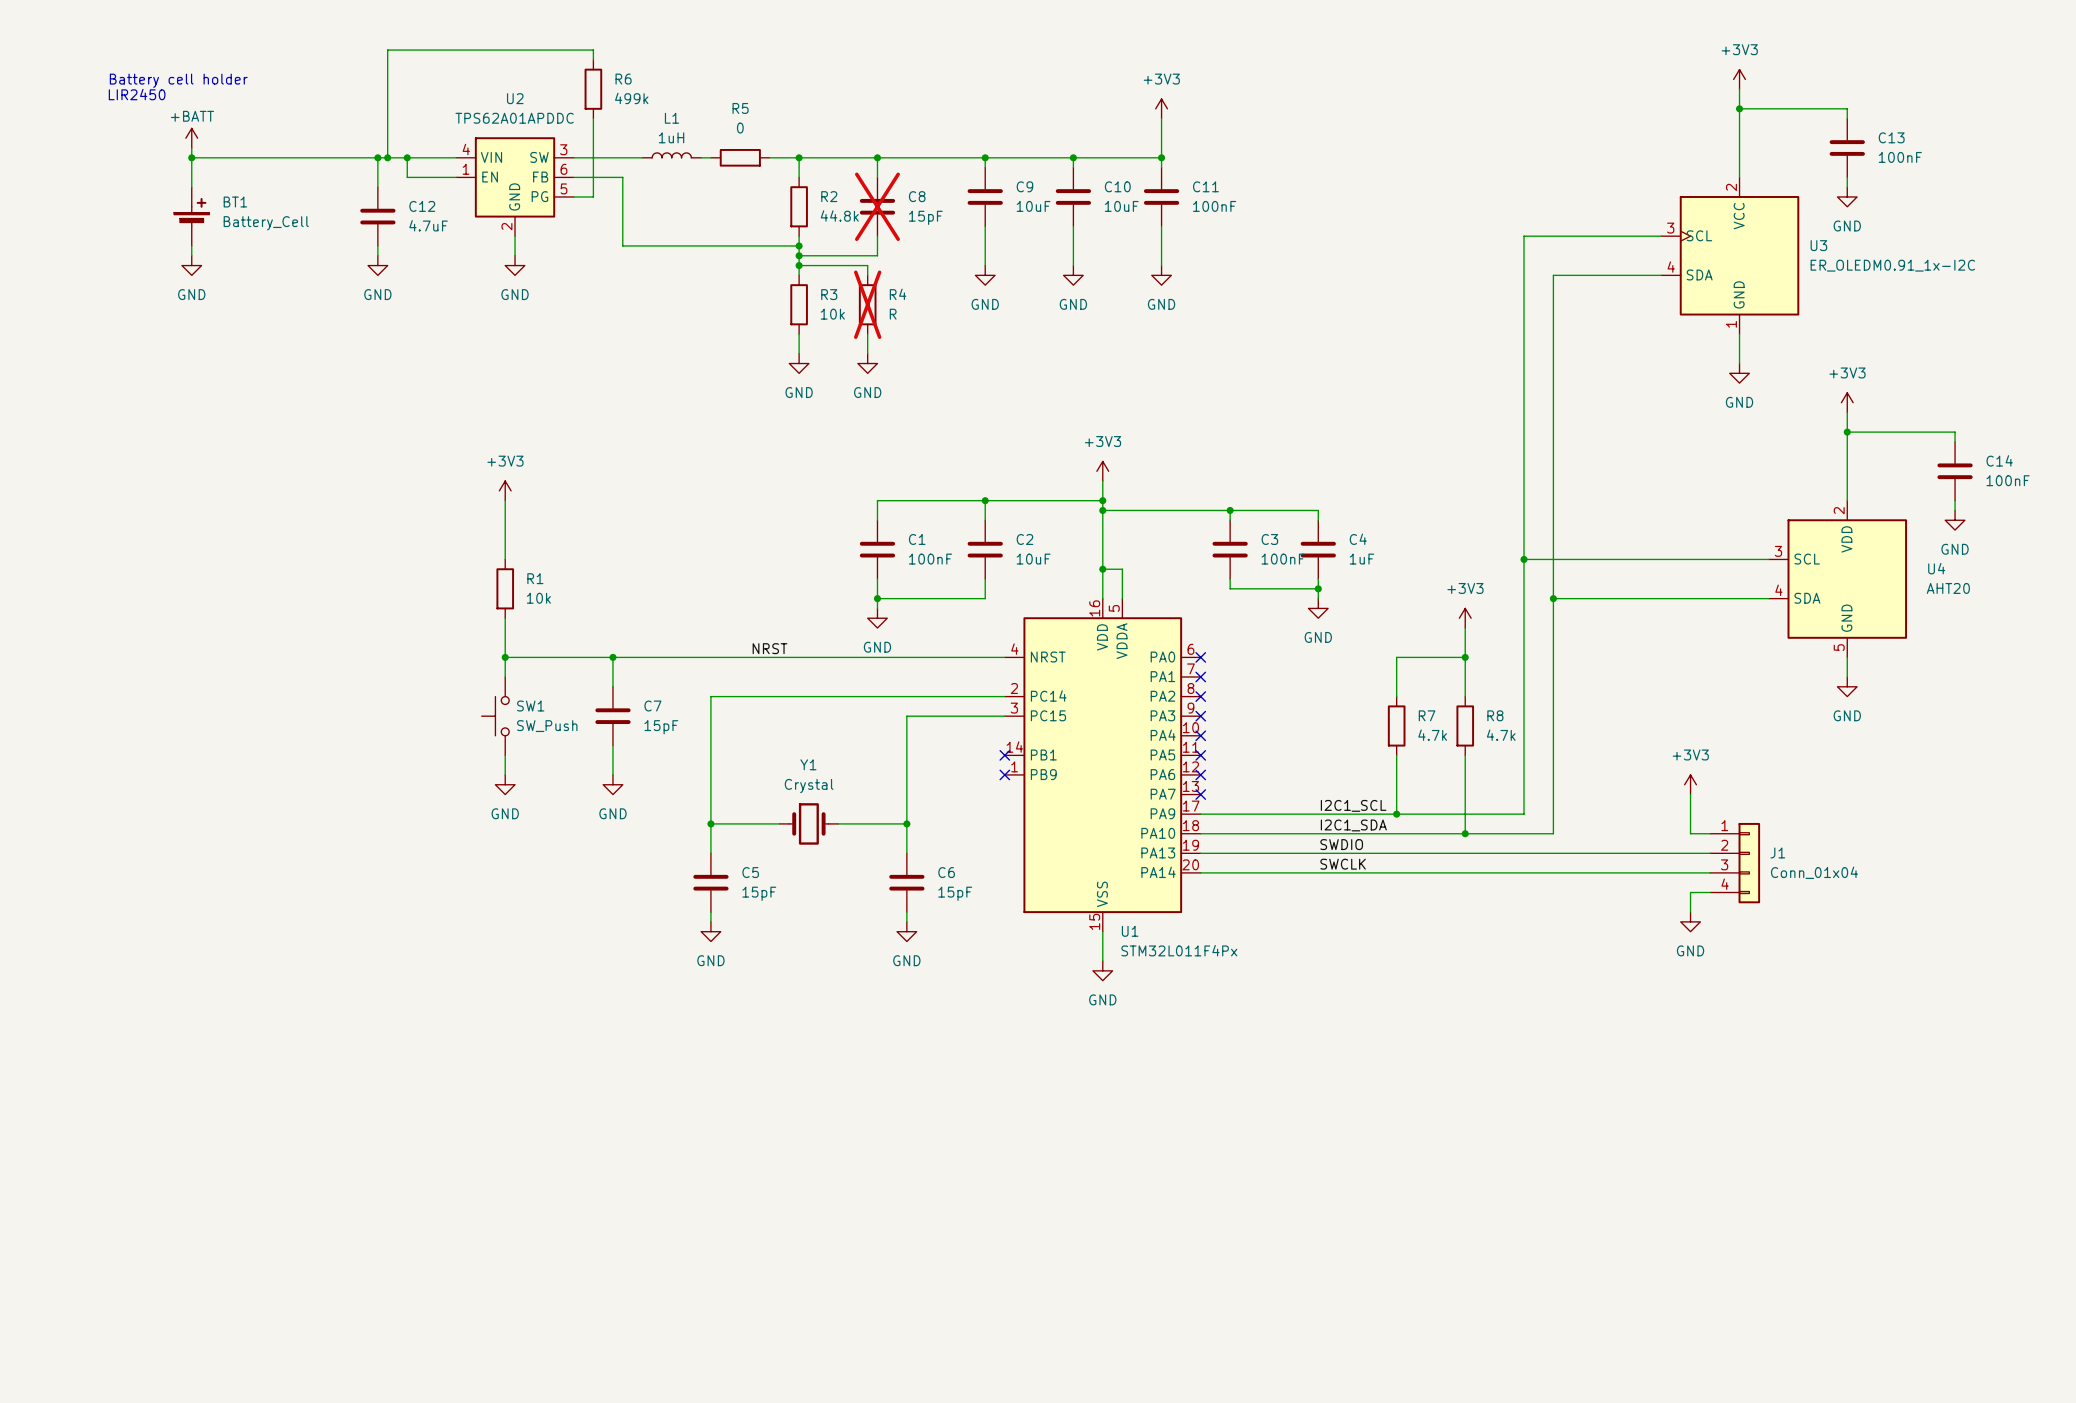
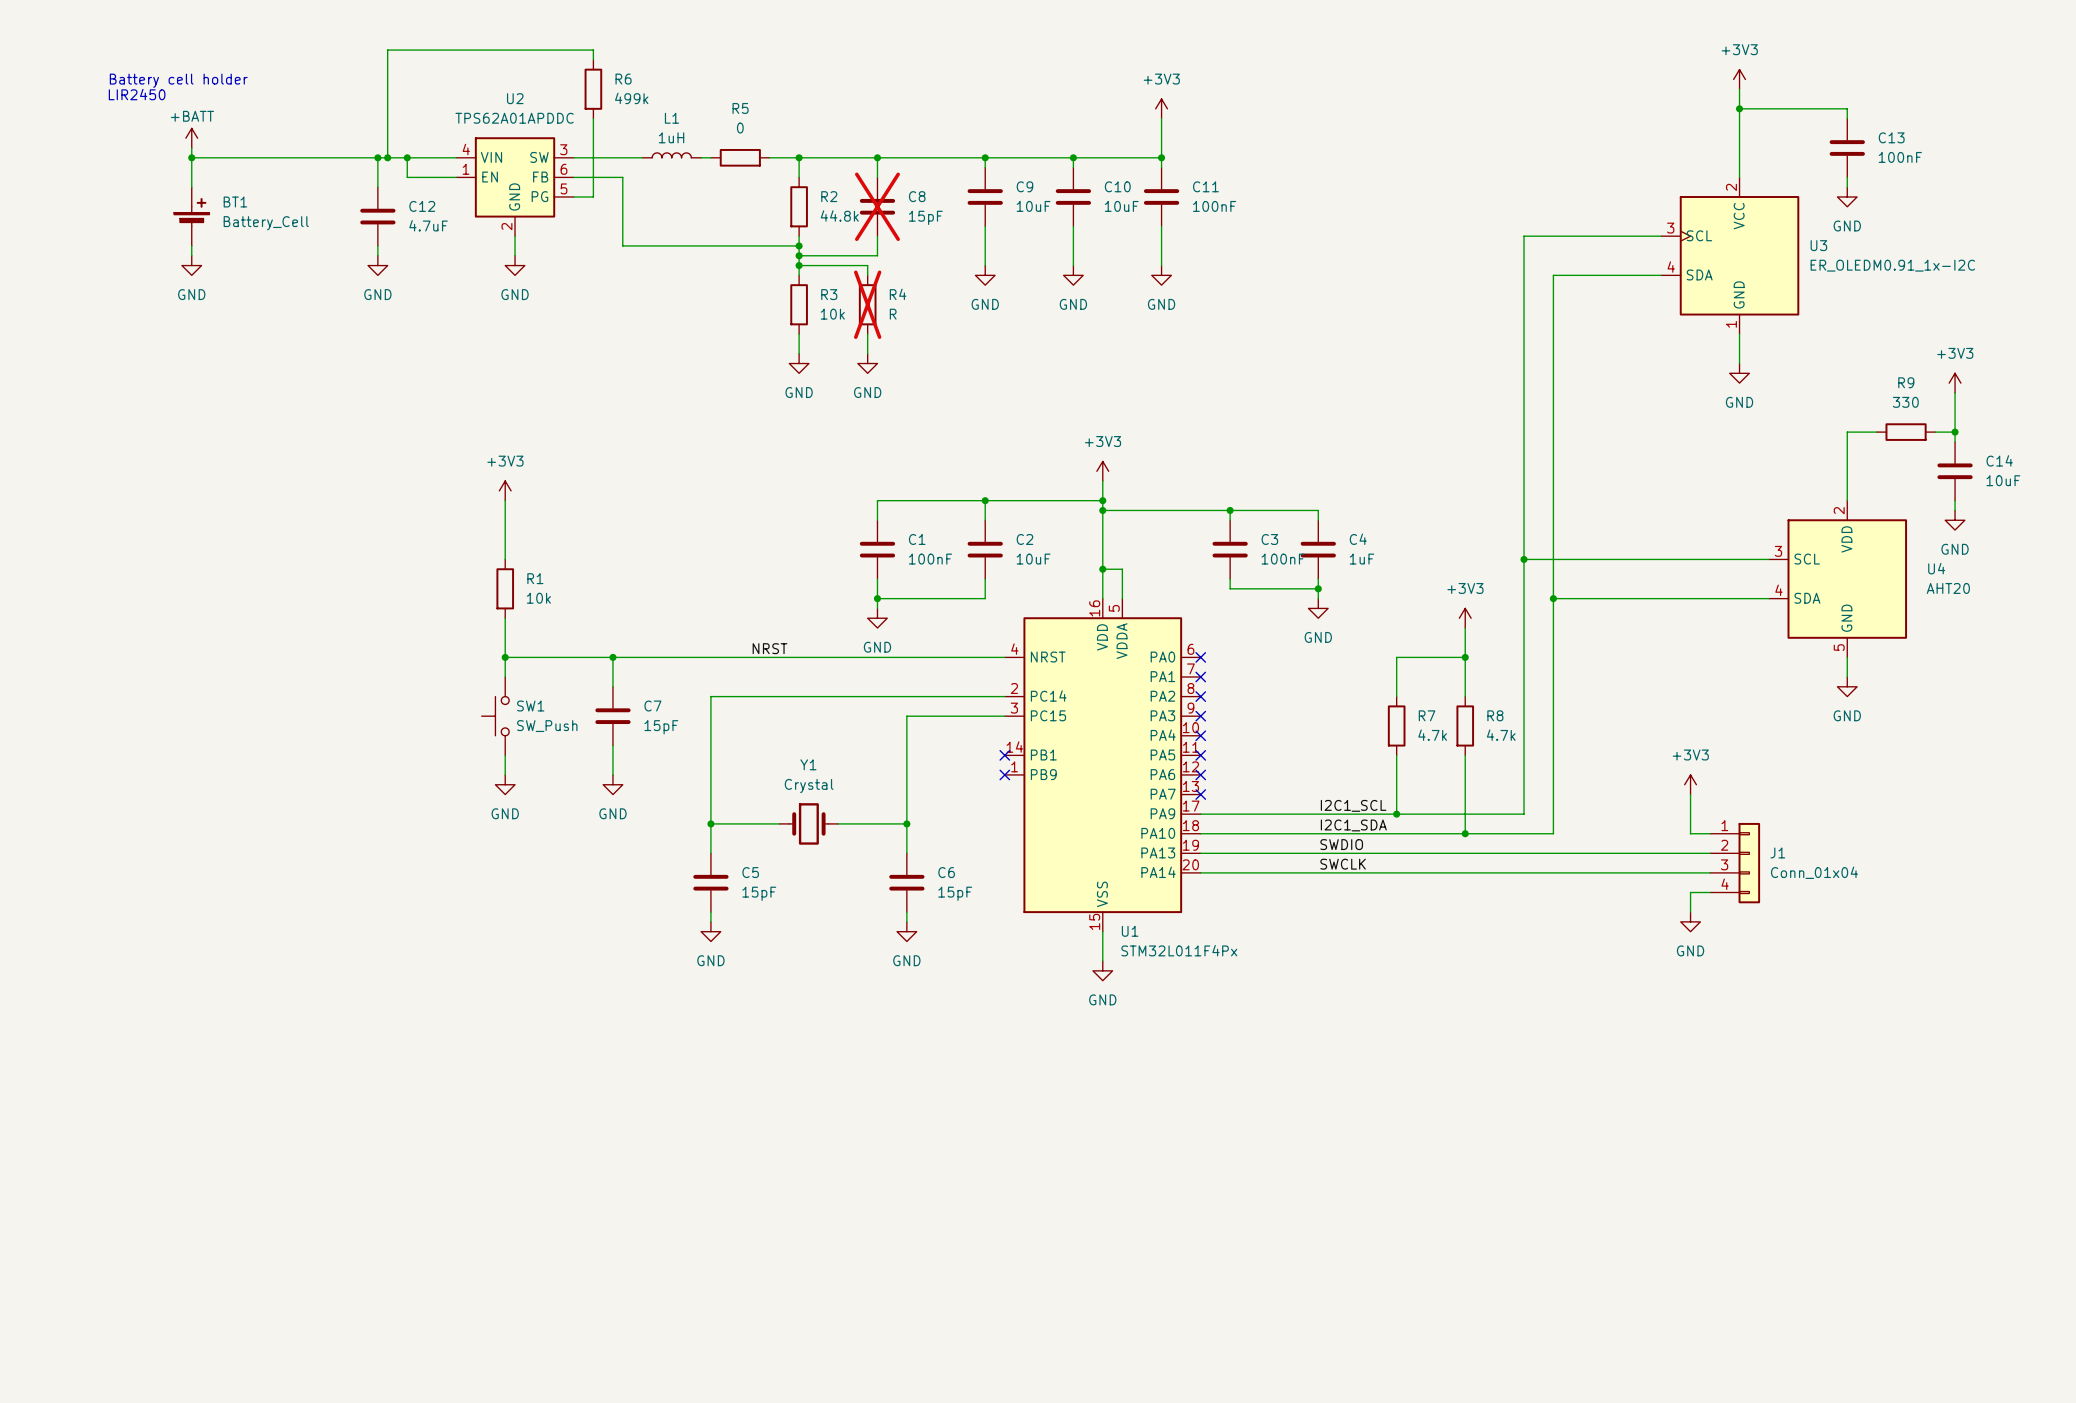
wire: none -> (1955, 392) (1955, 432)
power symbol position: +3V3 (1847, 402) -> +3V3 (1955, 383)
wire: (1847, 412) (1847, 432) -> none
junction: (1847, 432) -> none
wire: (1876, 432) (1935, 432) -> none
R9: none -> 330 (1906, 432)
junction: none -> (1955, 432)
C14 value: 100nF (2008, 480) -> 10uF (2003, 480)

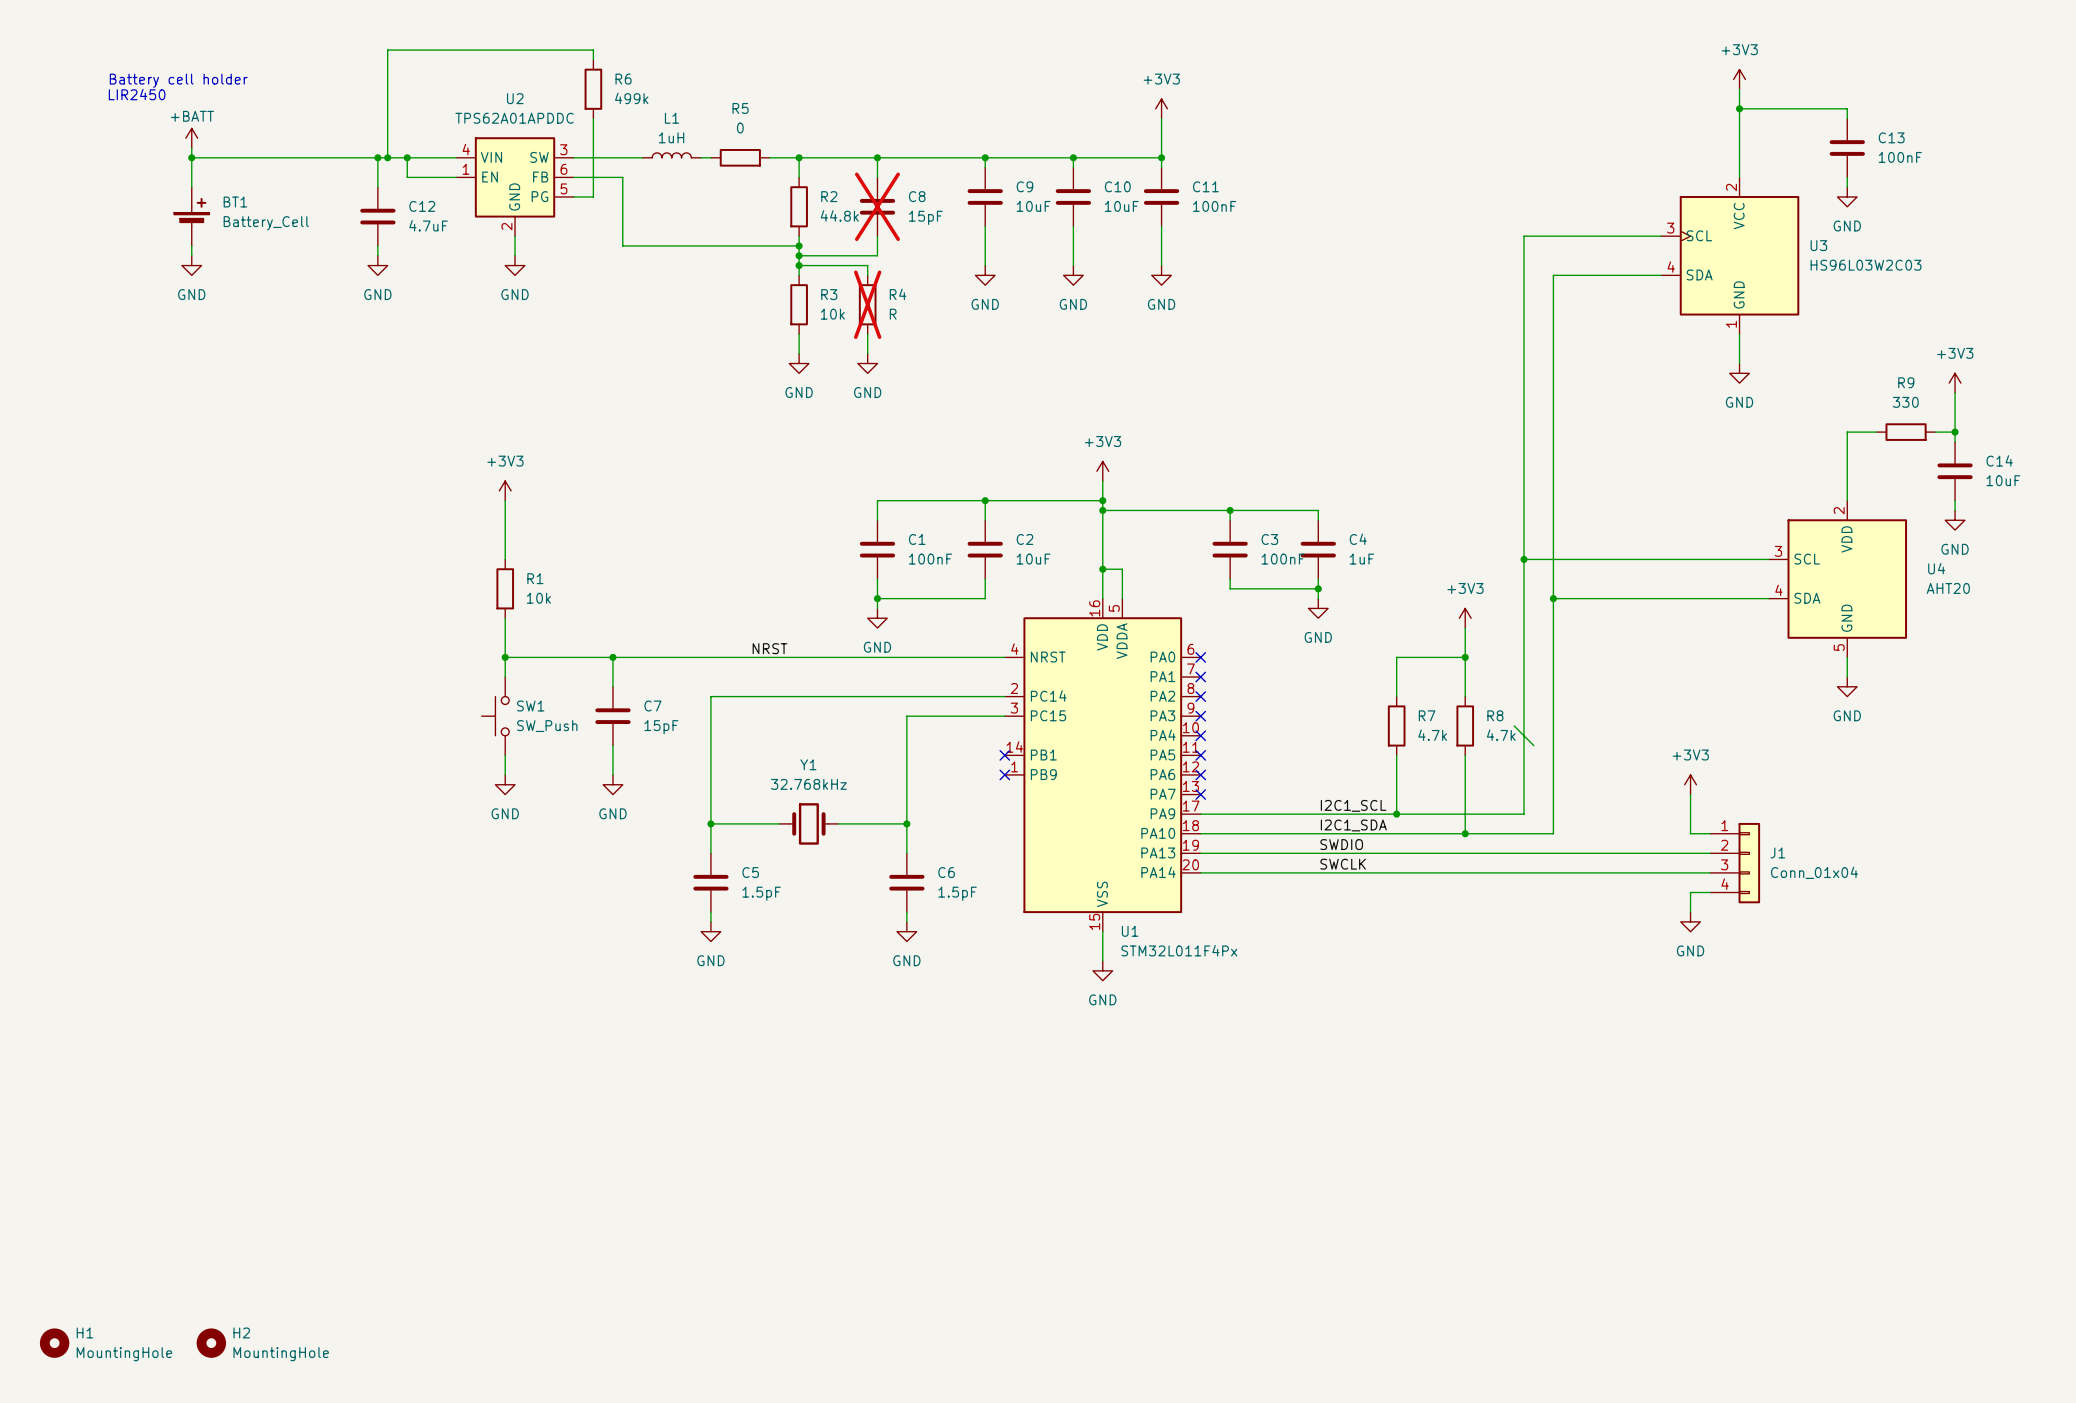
U3 value: ER_OLEDM0.91_1x-I2C (1892, 265) -> HS96L03W2C03 (1866, 265)
wire: none -> (1514, 725) (1533, 745)
Y1 value: Crystal (809, 786) -> 32.768kHz (808, 784)
C5 value: 15pF (759, 893) -> 1.5pF (761, 893)
C6 value: 15pF (955, 893) -> 1.5pF (957, 893)
H1: none -> MountingHole (54, 1343)
H2: none -> MountingHole (211, 1343)

